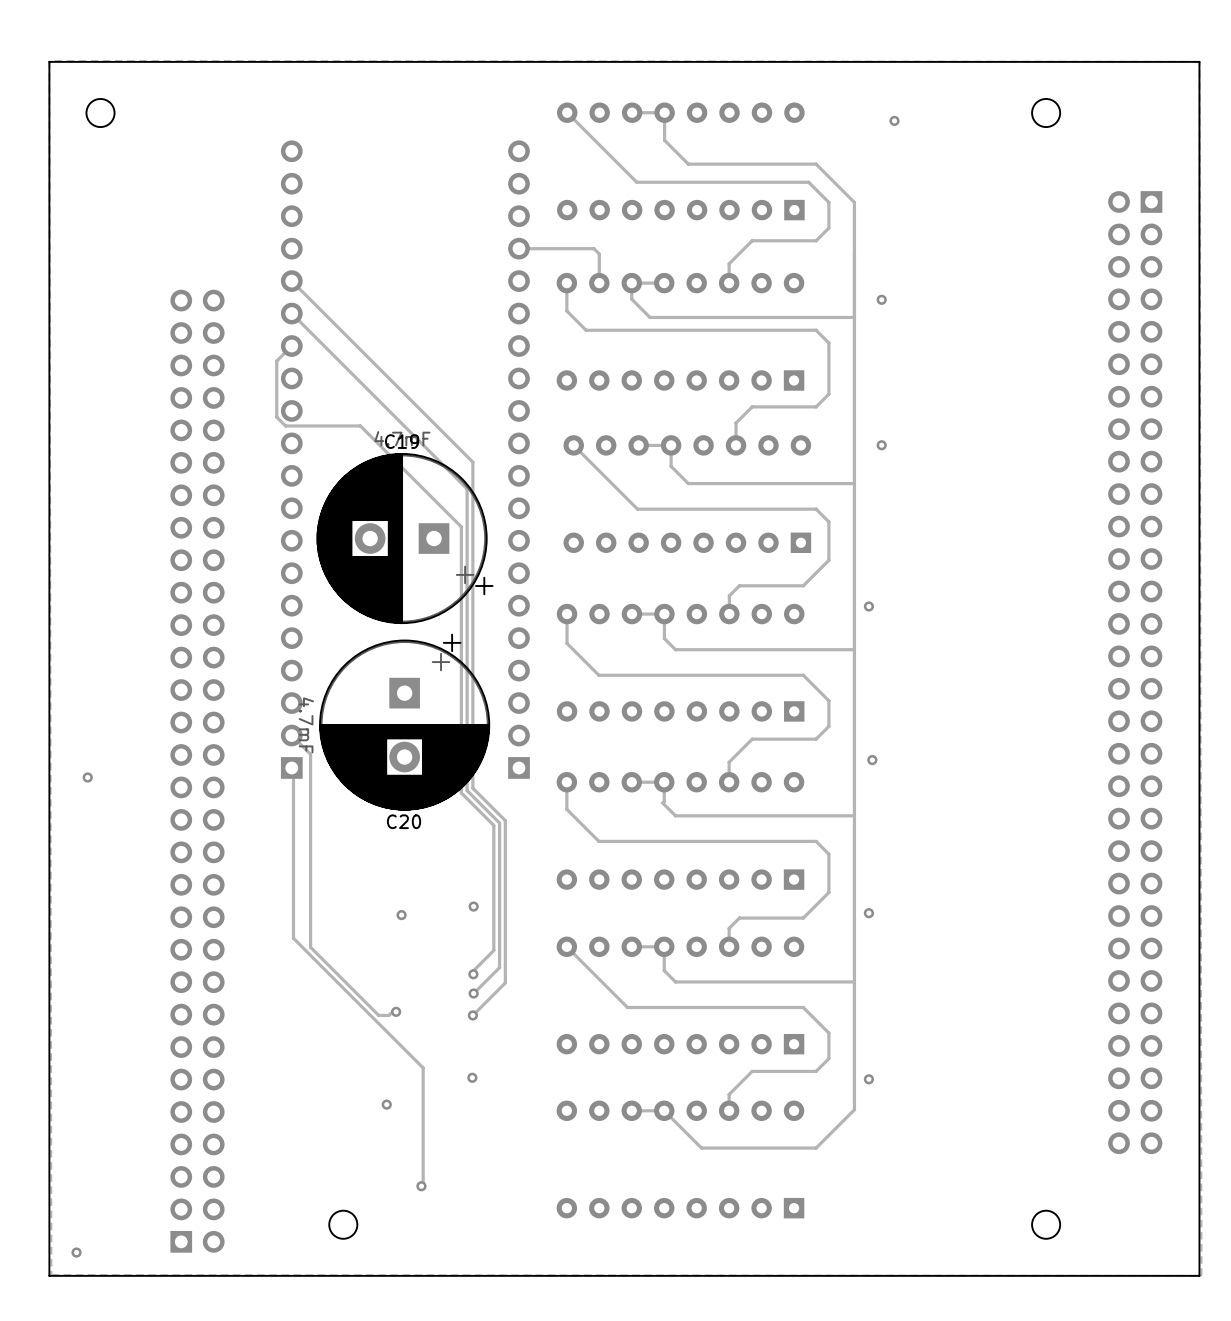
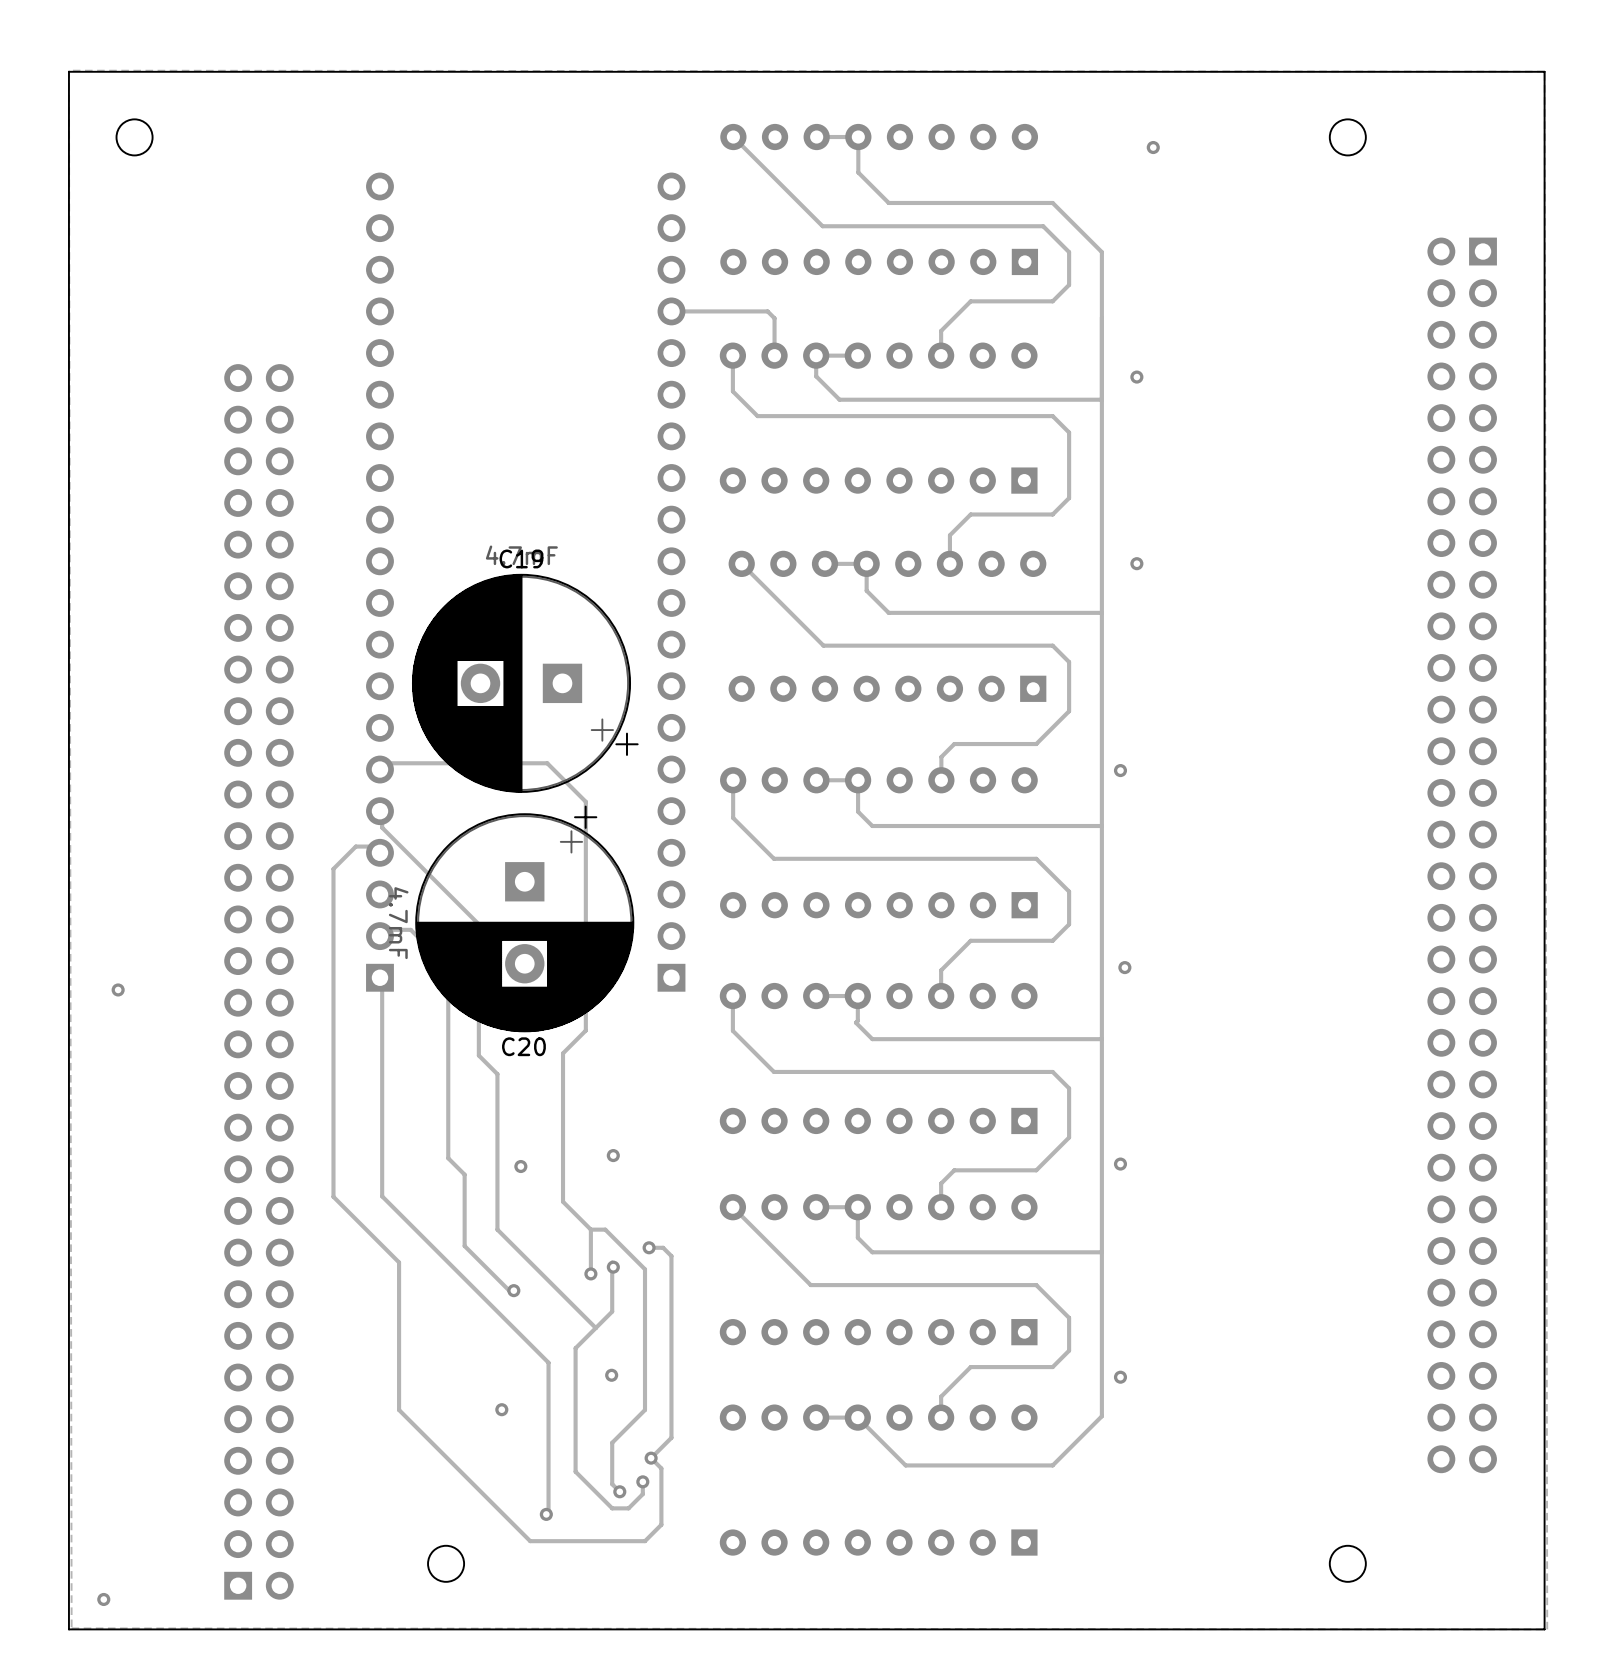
track: (291, 281) (472, 462) (472, 788) (505, 820) (505, 982) (472, 1015) -> none
track: (291, 313) (467, 488) (467, 790) (499, 823) (499, 967) (473, 993) -> none
track: (291, 346) (276, 361) (276, 417) (285, 425) (360, 425) (461, 526) (461, 792) (493, 825) (493, 950) (473, 970) (473, 974) -> none
track: none -> (379, 769) (386, 763) (547, 763) (585, 801) (585, 1030) (563, 1053) (563, 1201) (590, 1229)
track: none -> (382, 804) (382, 827) (478, 924) (478, 1055) (497, 1074) (497, 1229) (595, 1328)
track: none -> (382, 846) (355, 846) (333, 868) (333, 1196) (399, 1262) (399, 1409) (530, 1541) (645, 1541) (661, 1524) (661, 1468) (651, 1458) (671, 1437) (671, 1256) (663, 1247) (649, 1247)
track: (291, 735) (310, 754) (310, 947) (378, 1015) (388, 1015) (392, 1011) -> (382, 929) (410, 929) (448, 967) (448, 1158) (464, 1174) (464, 1246) (509, 1290)
track: none -> (590, 1229) (605, 1229) (645, 1269) (645, 1409) (612, 1442) (612, 1484) (619, 1491)
track: none -> (590, 1229) (590, 1273)
via: (473, 974) -> none
via: none -> (649, 1247)
track: none -> (612, 1262) (612, 1311) (575, 1348) (575, 1471) (612, 1508) (628, 1508) (642, 1494) (642, 1481)
via: none -> (590, 1273)
via: (472, 1015) -> none
via: none -> (651, 1458)
via: none -> (642, 1481)
via: none -> (619, 1491)

